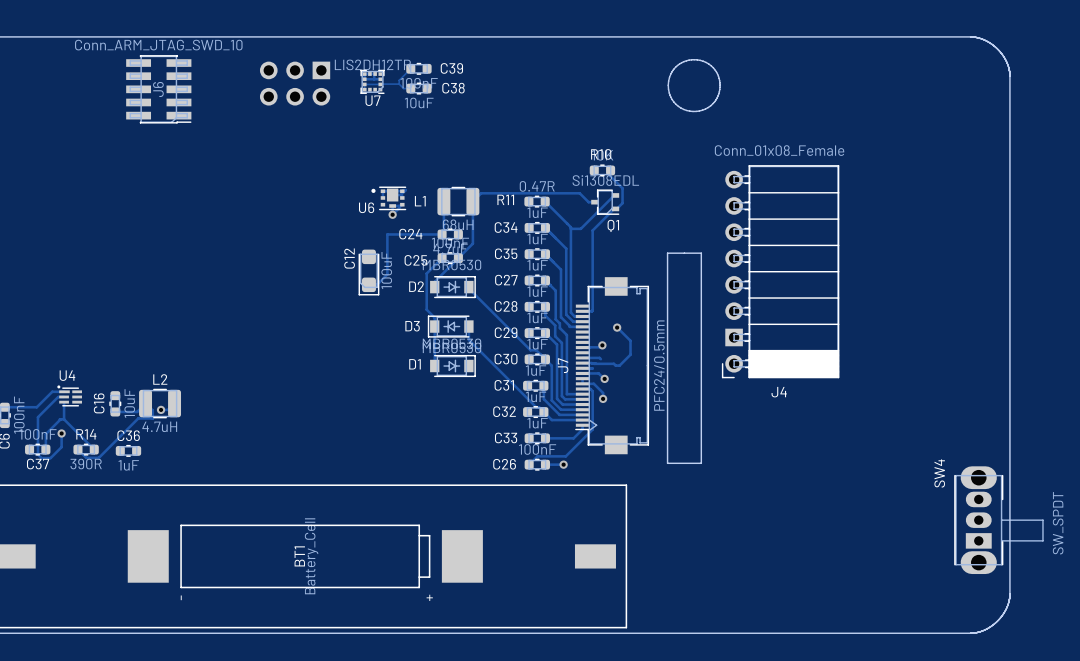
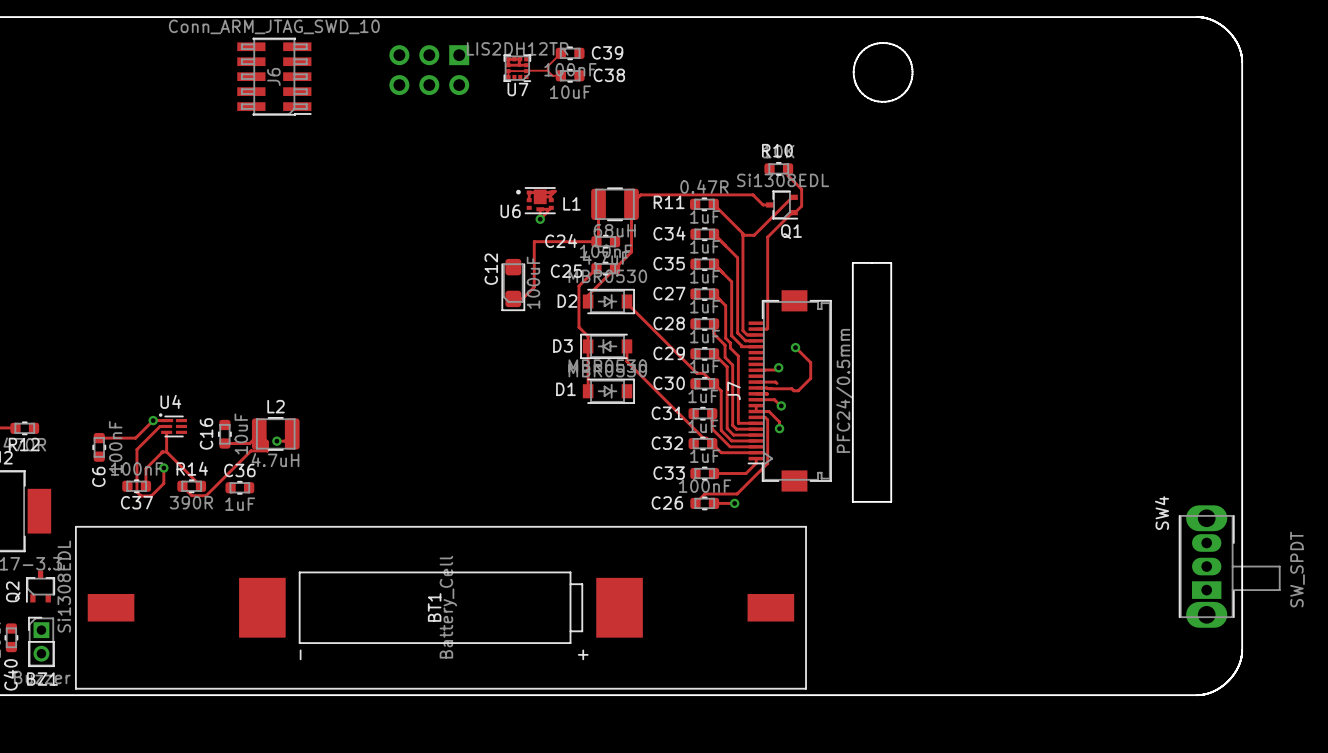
J4: Conn_01x08_Female (780, 271) -> none
via: none -> (153, 420)

